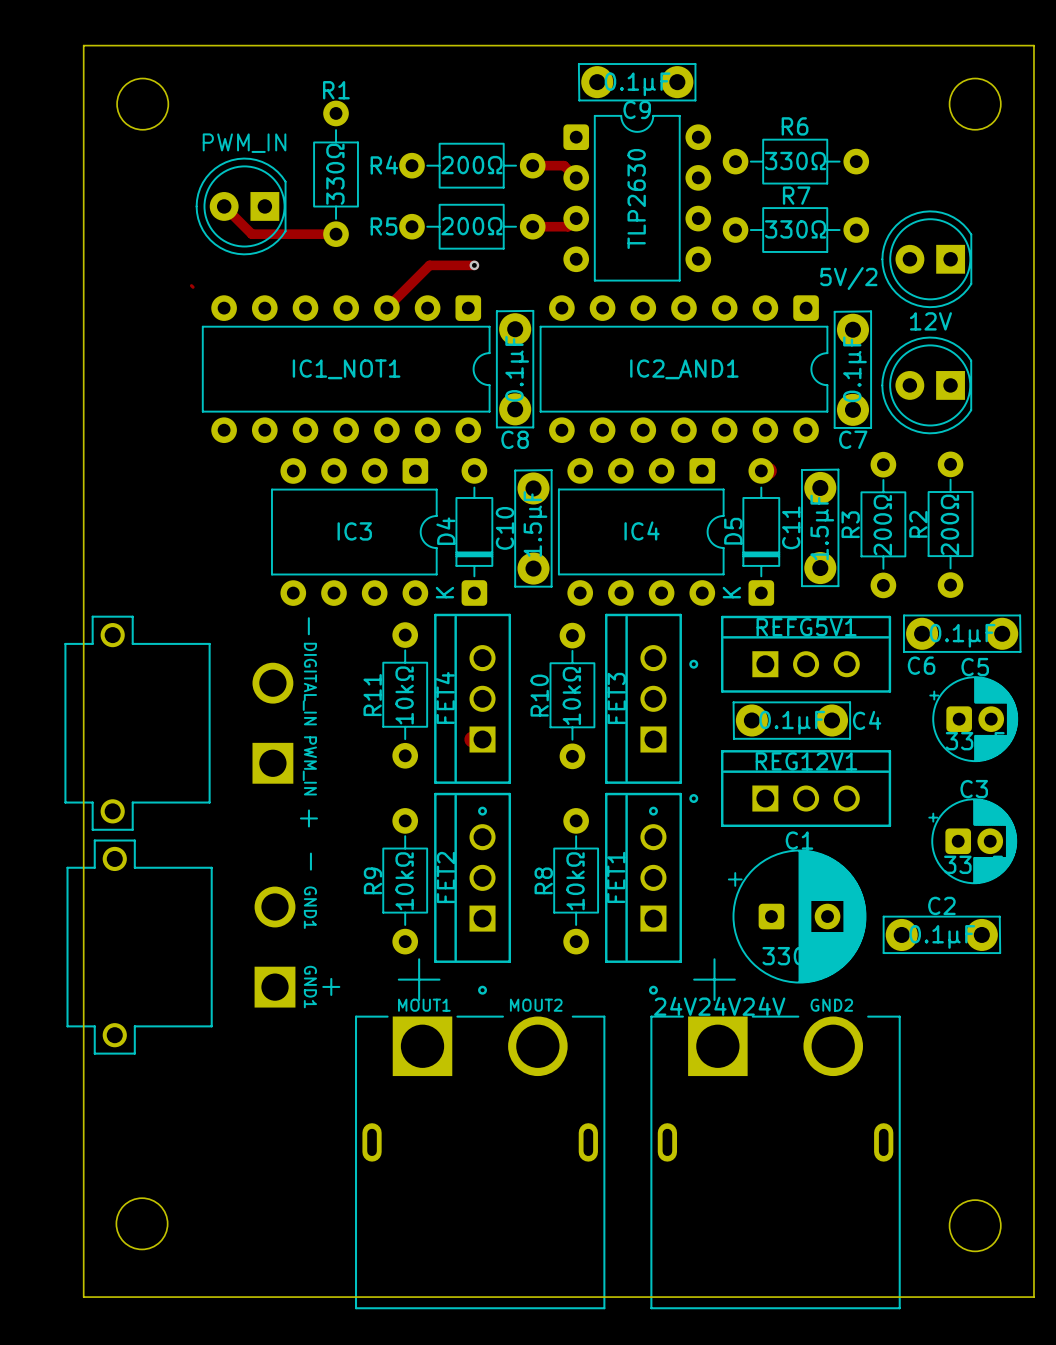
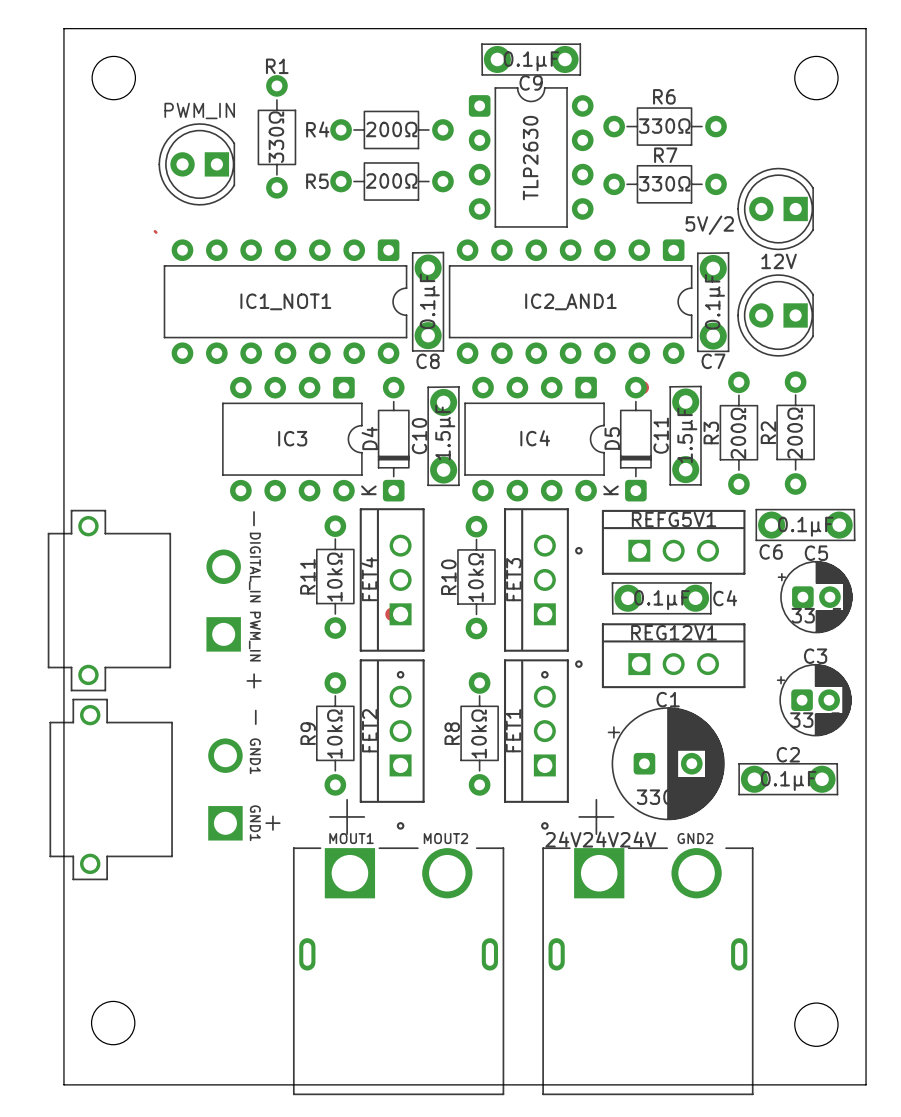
track: (532, 165) (564, 165) (576, 177) -> none
track: (224, 206) (251, 234) (336, 234) -> none
track: (576, 218) (568, 226) (532, 226) -> none
track: (474, 265) (429, 265) (386, 308) -> none
via: (474, 265) -> none

